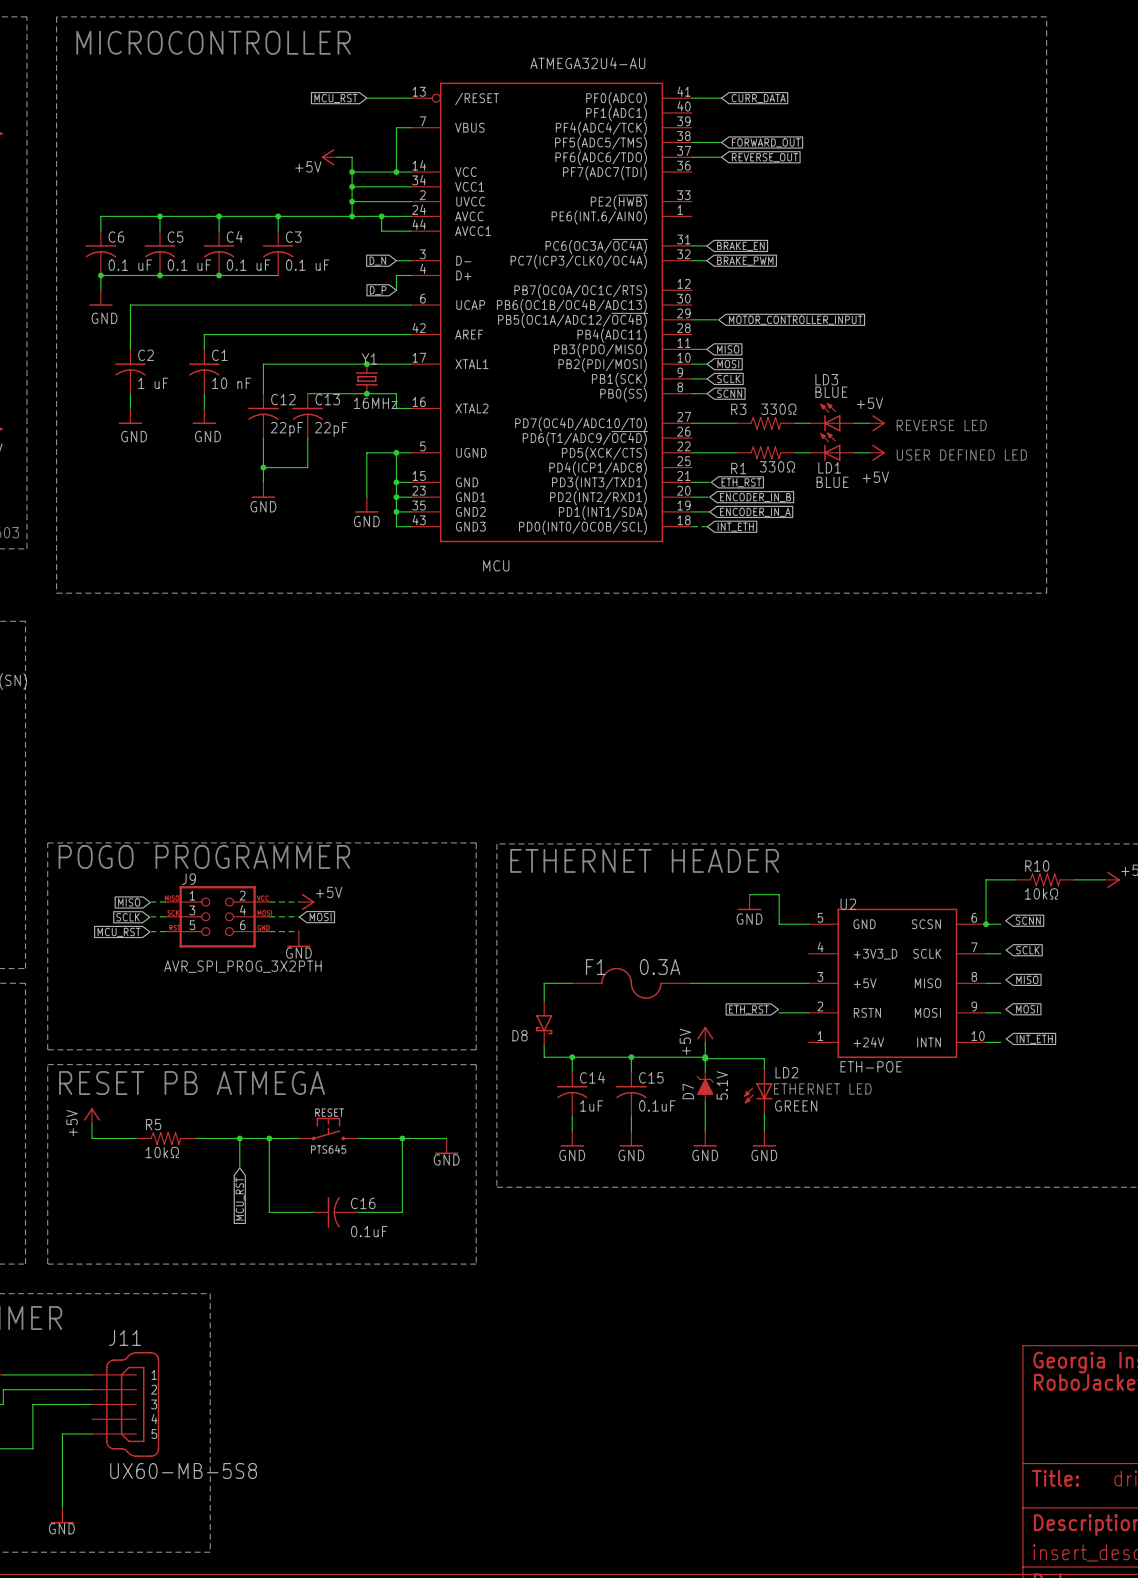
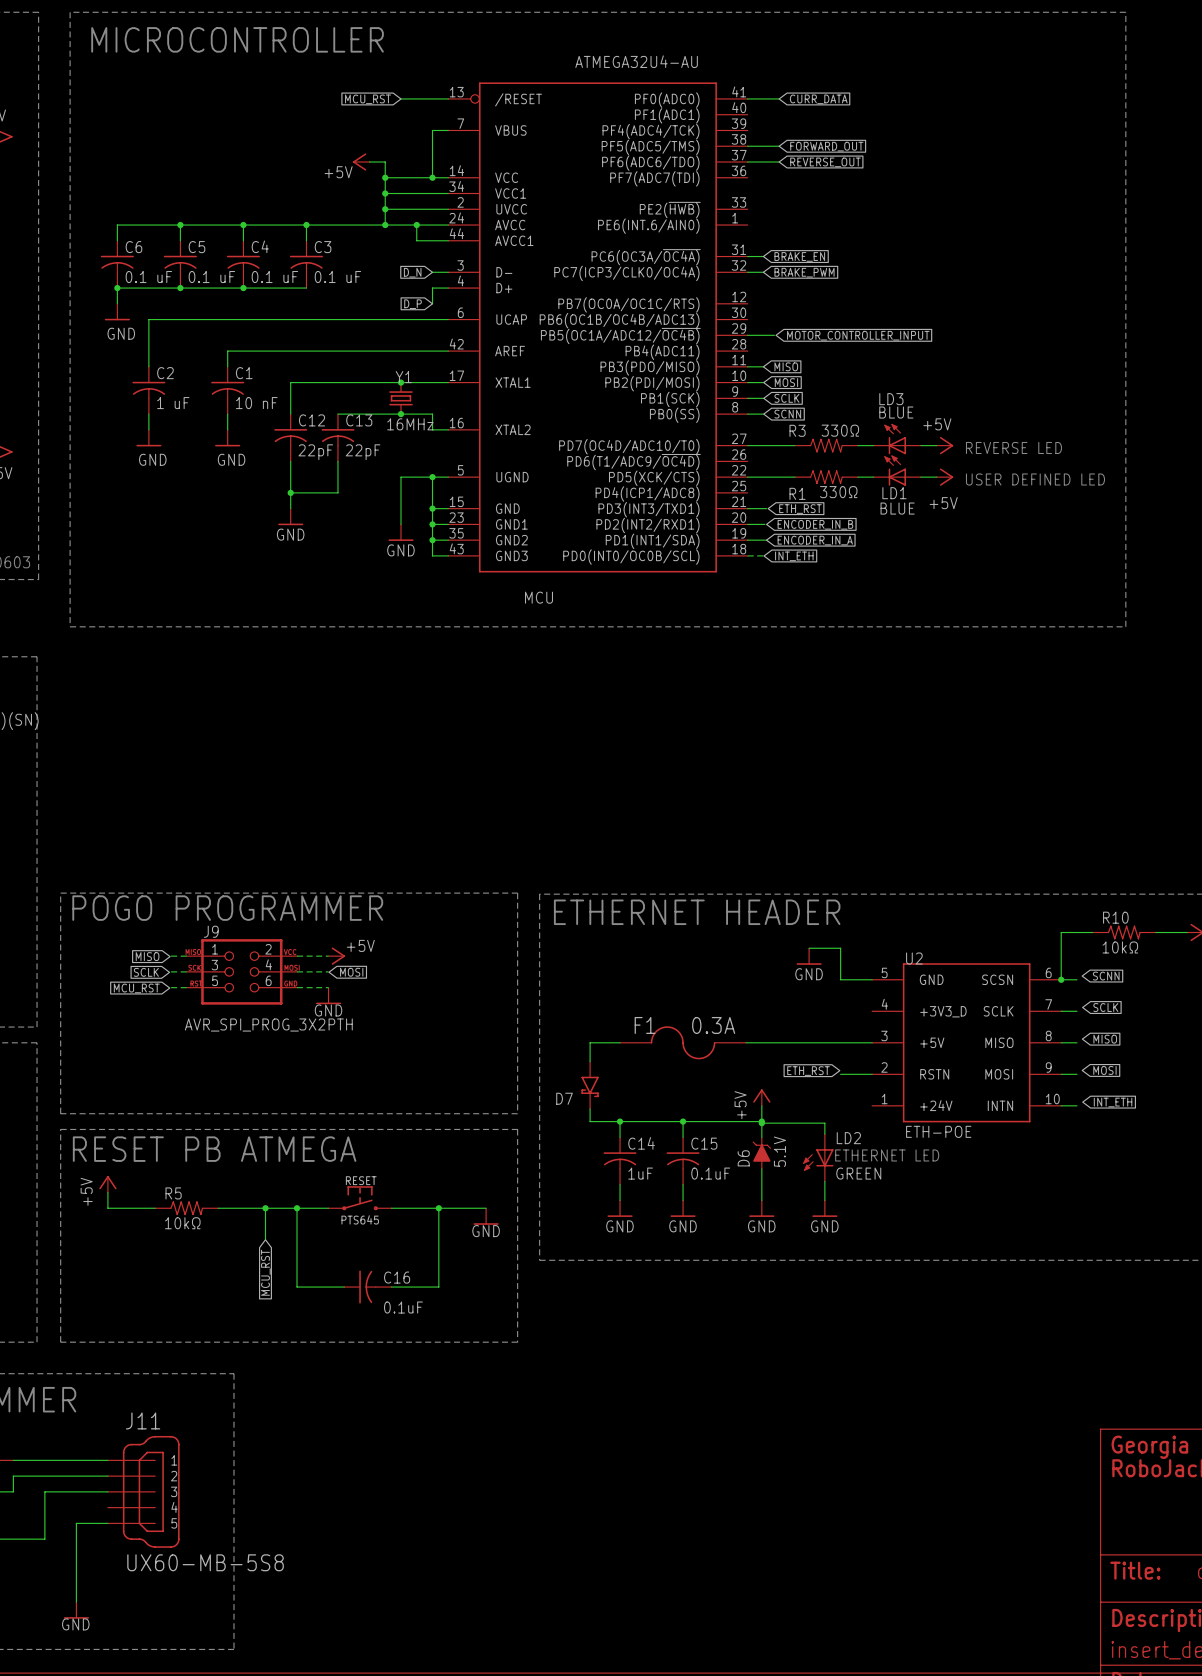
D8 name: D8 (520, 1035) -> D7 (564, 1098)
D7 name: D7 (688, 1091) -> D6 (743, 1158)

